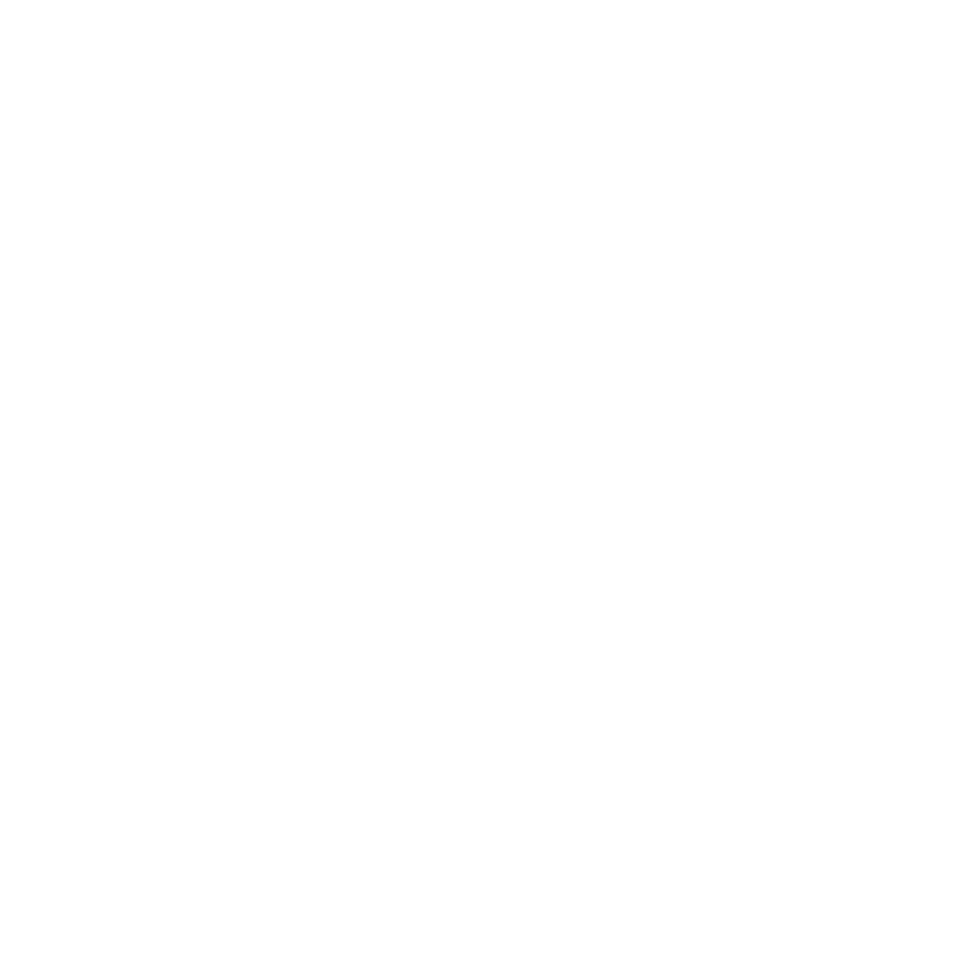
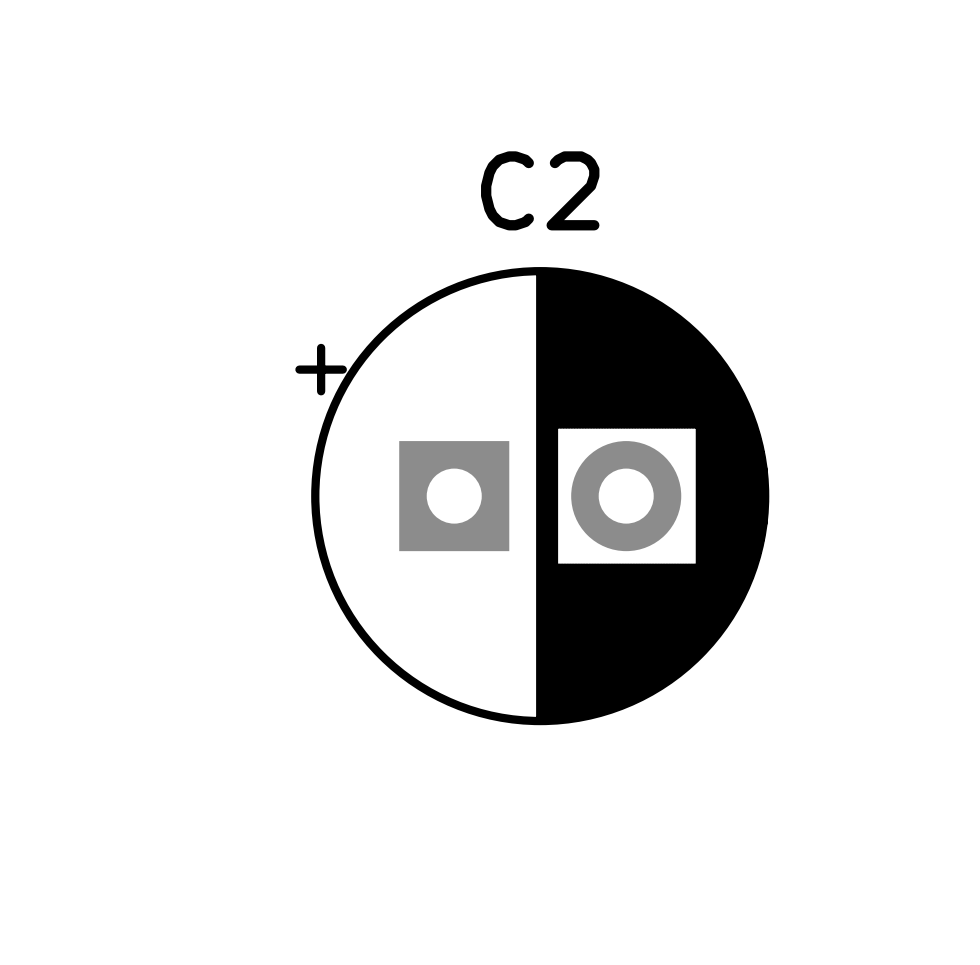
C2: none -> (532, 496)

